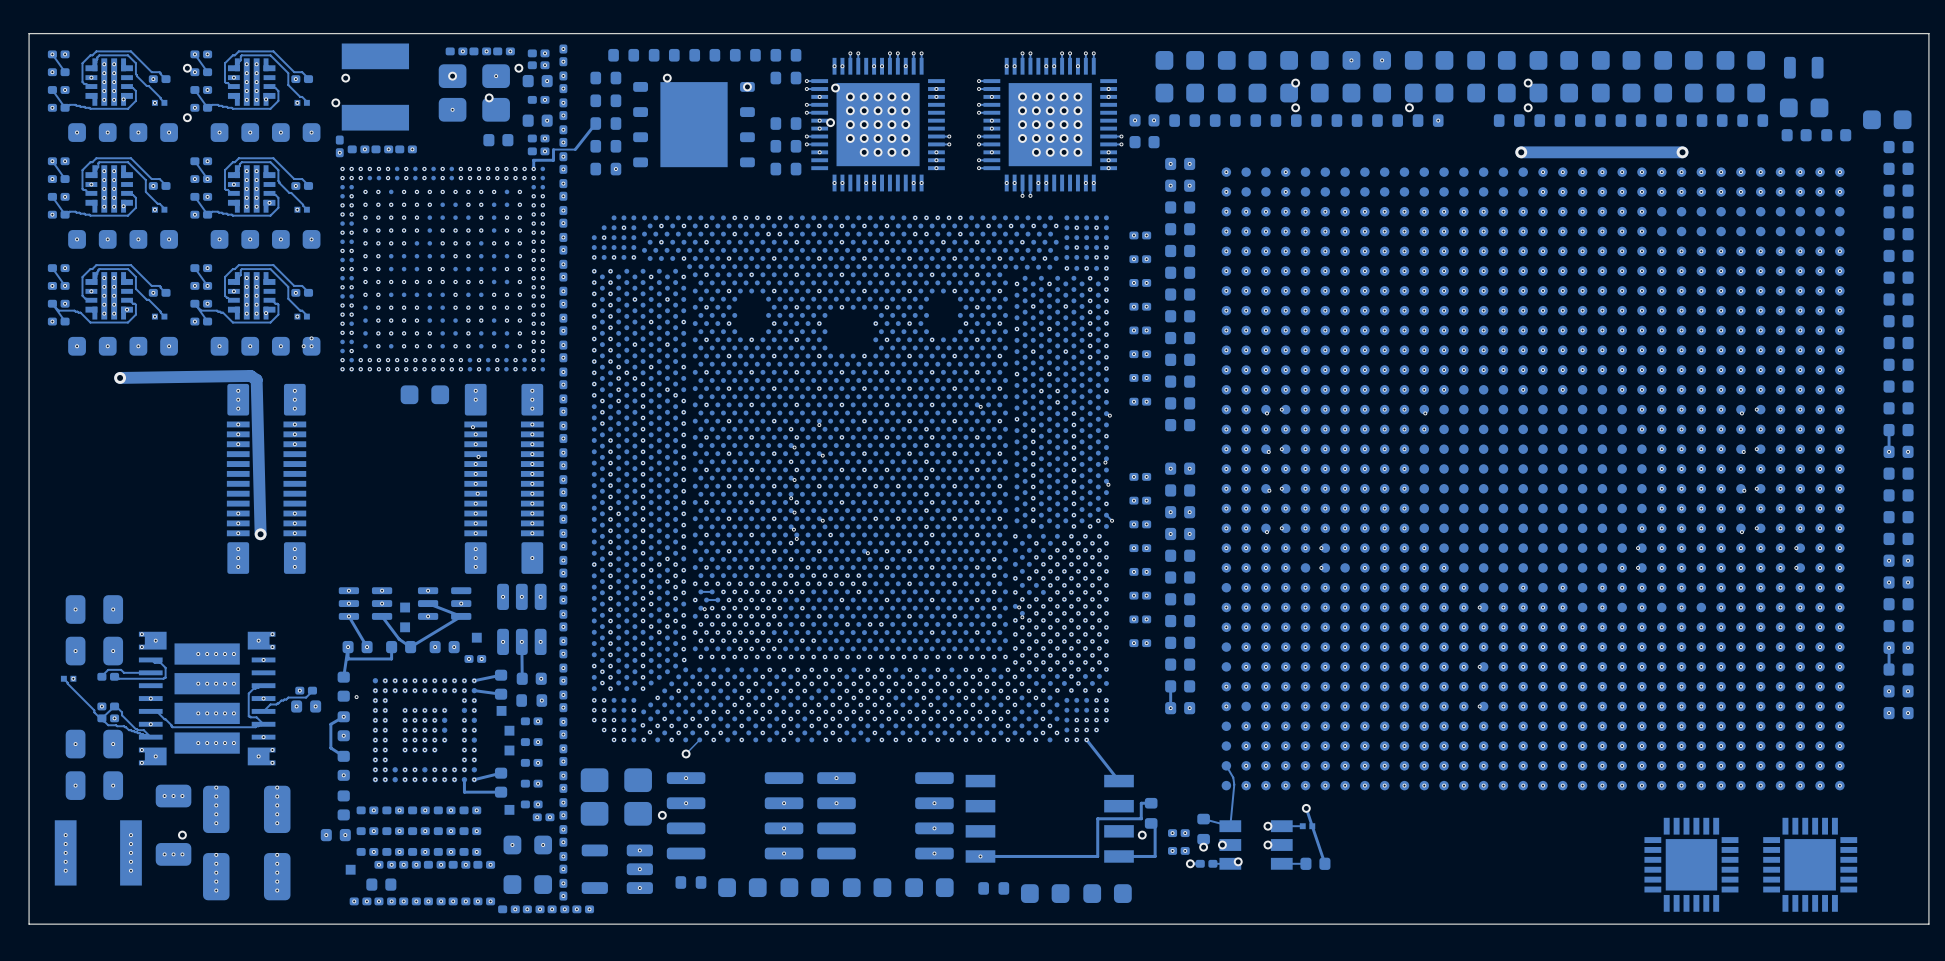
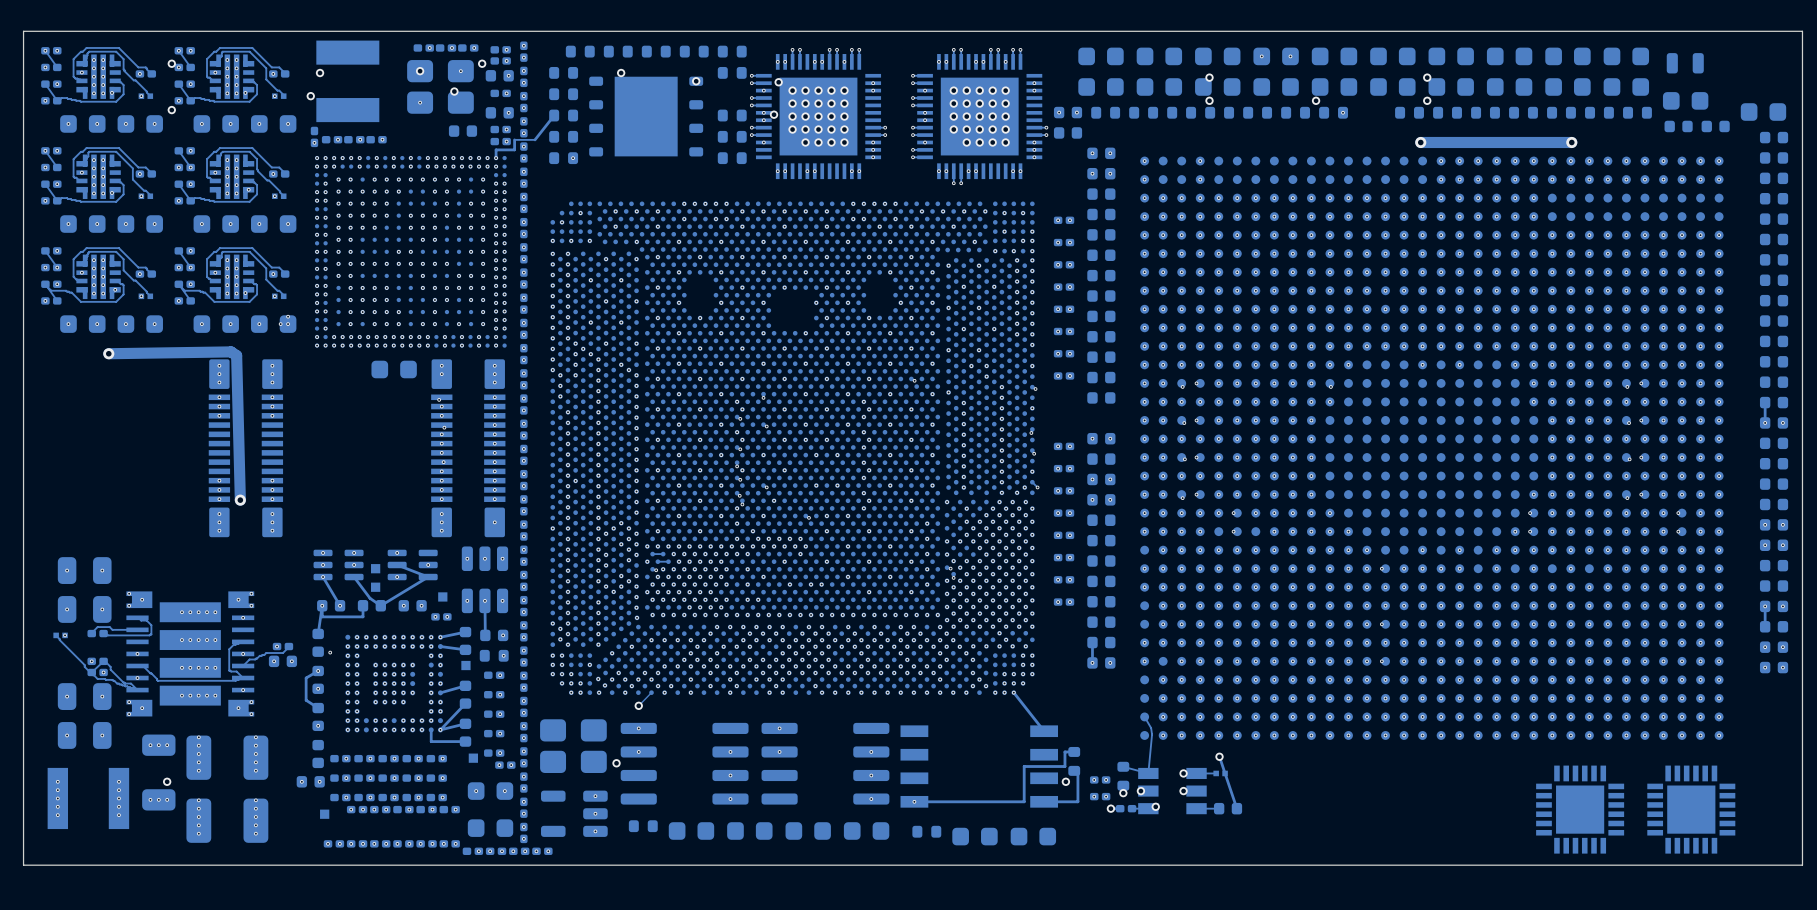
part: (509, 730) -> none
track: none -> (465, 685) (440, 692)
part: (509, 750) -> none
track: none -> (465, 703) (440, 729)
part rotation: 0° (381, 884) -> 90° clockwise (465, 694)
part position: (381, 884) -> (465, 694)

